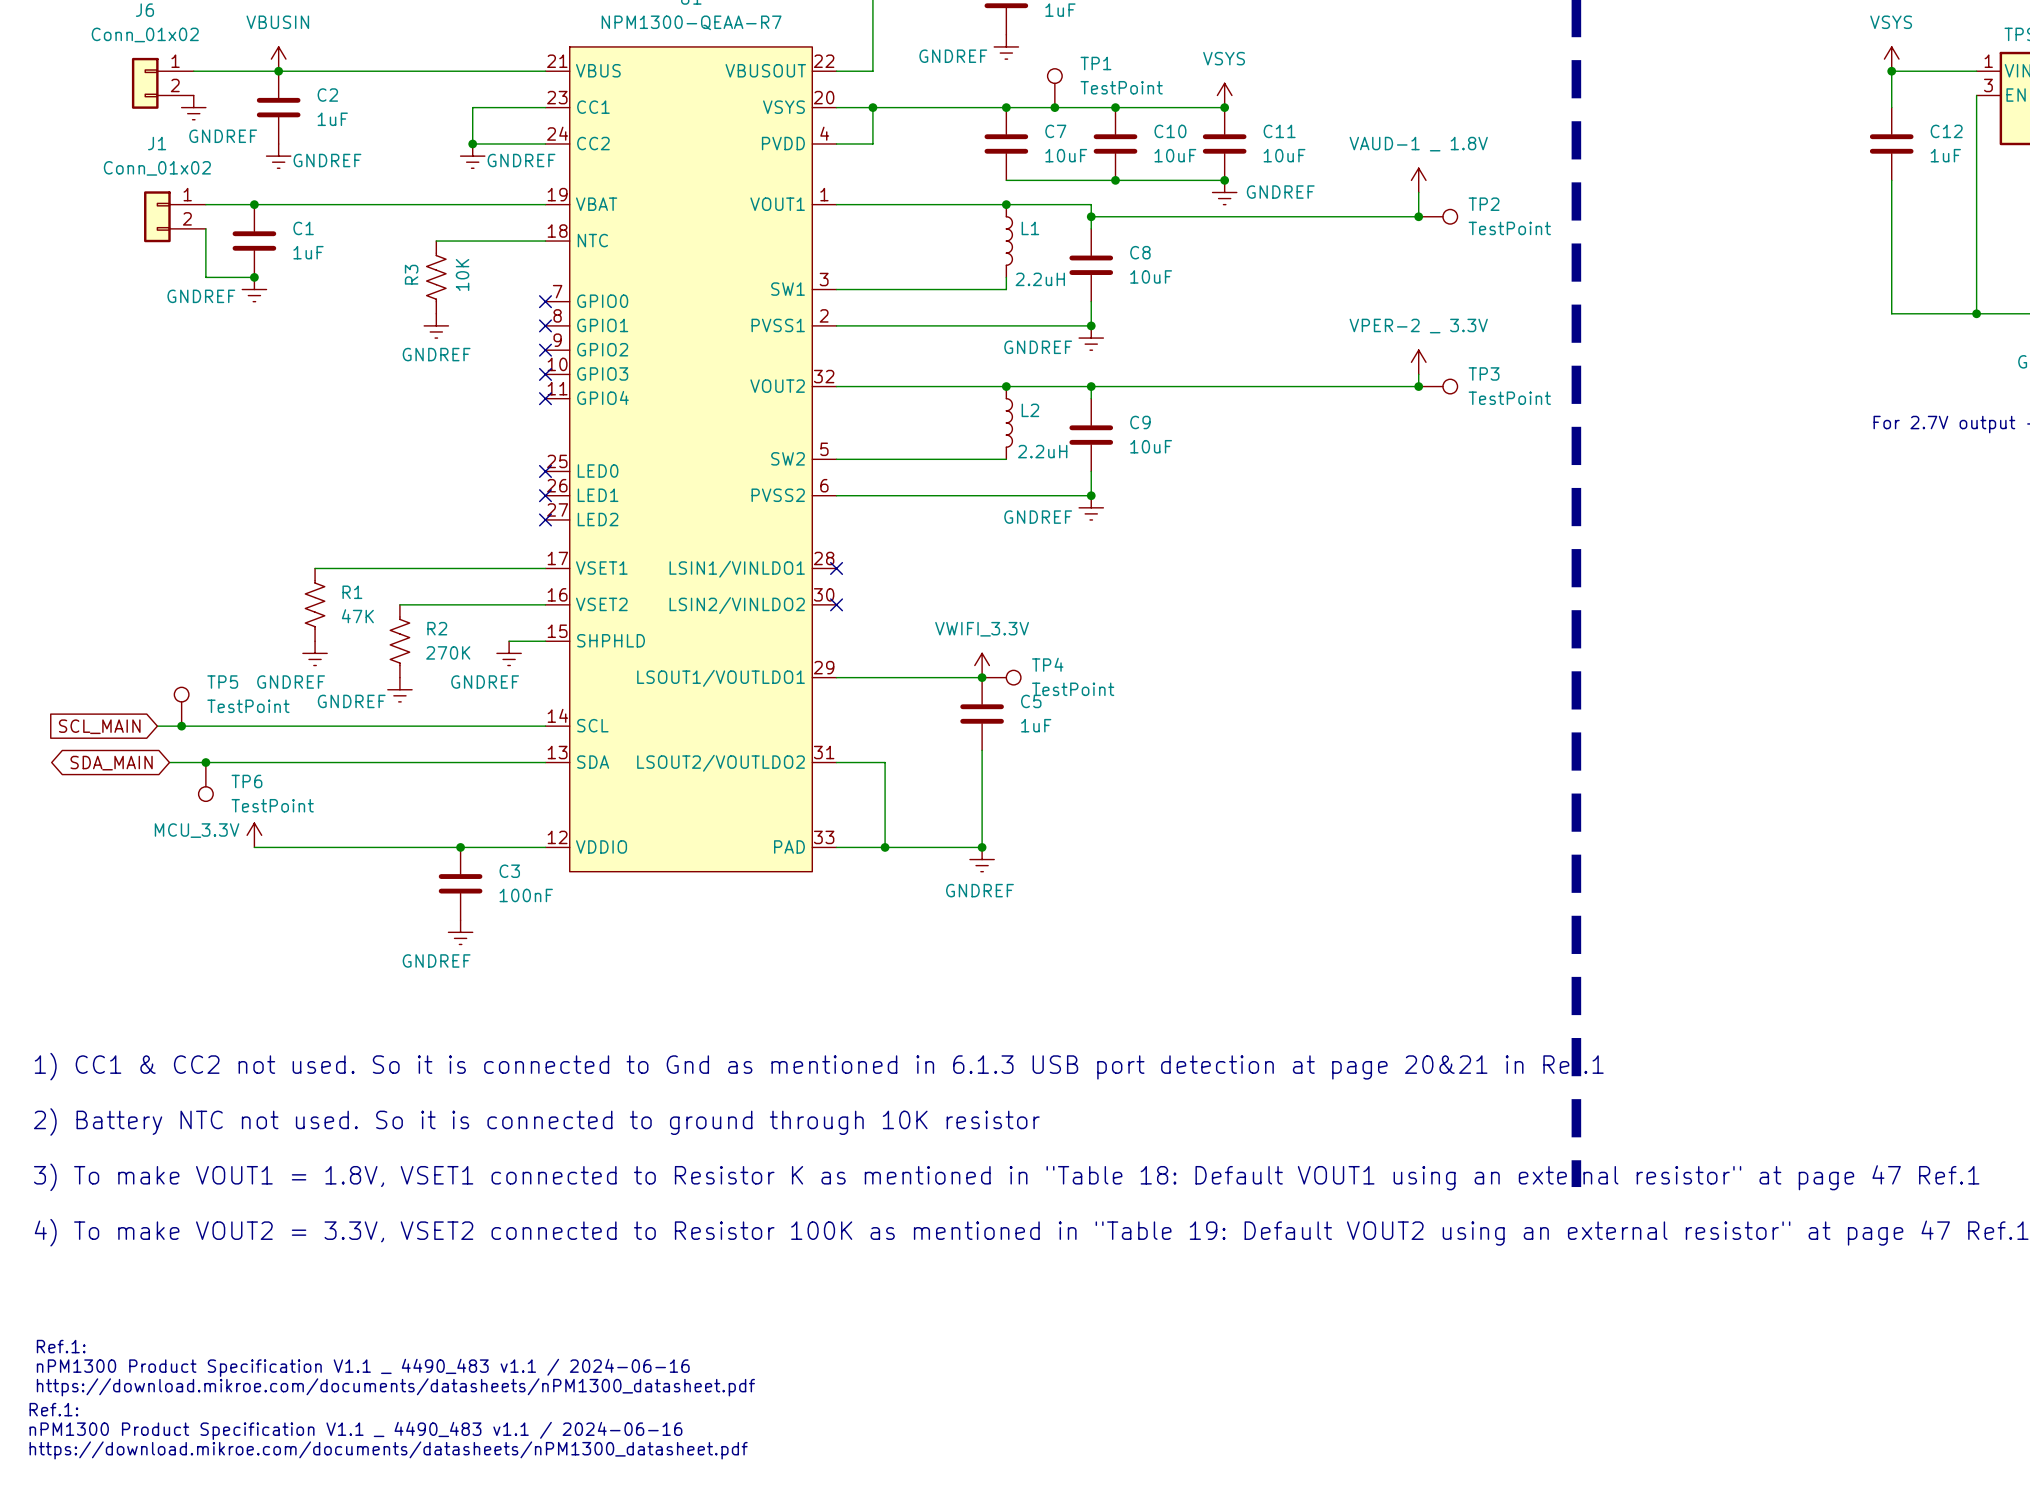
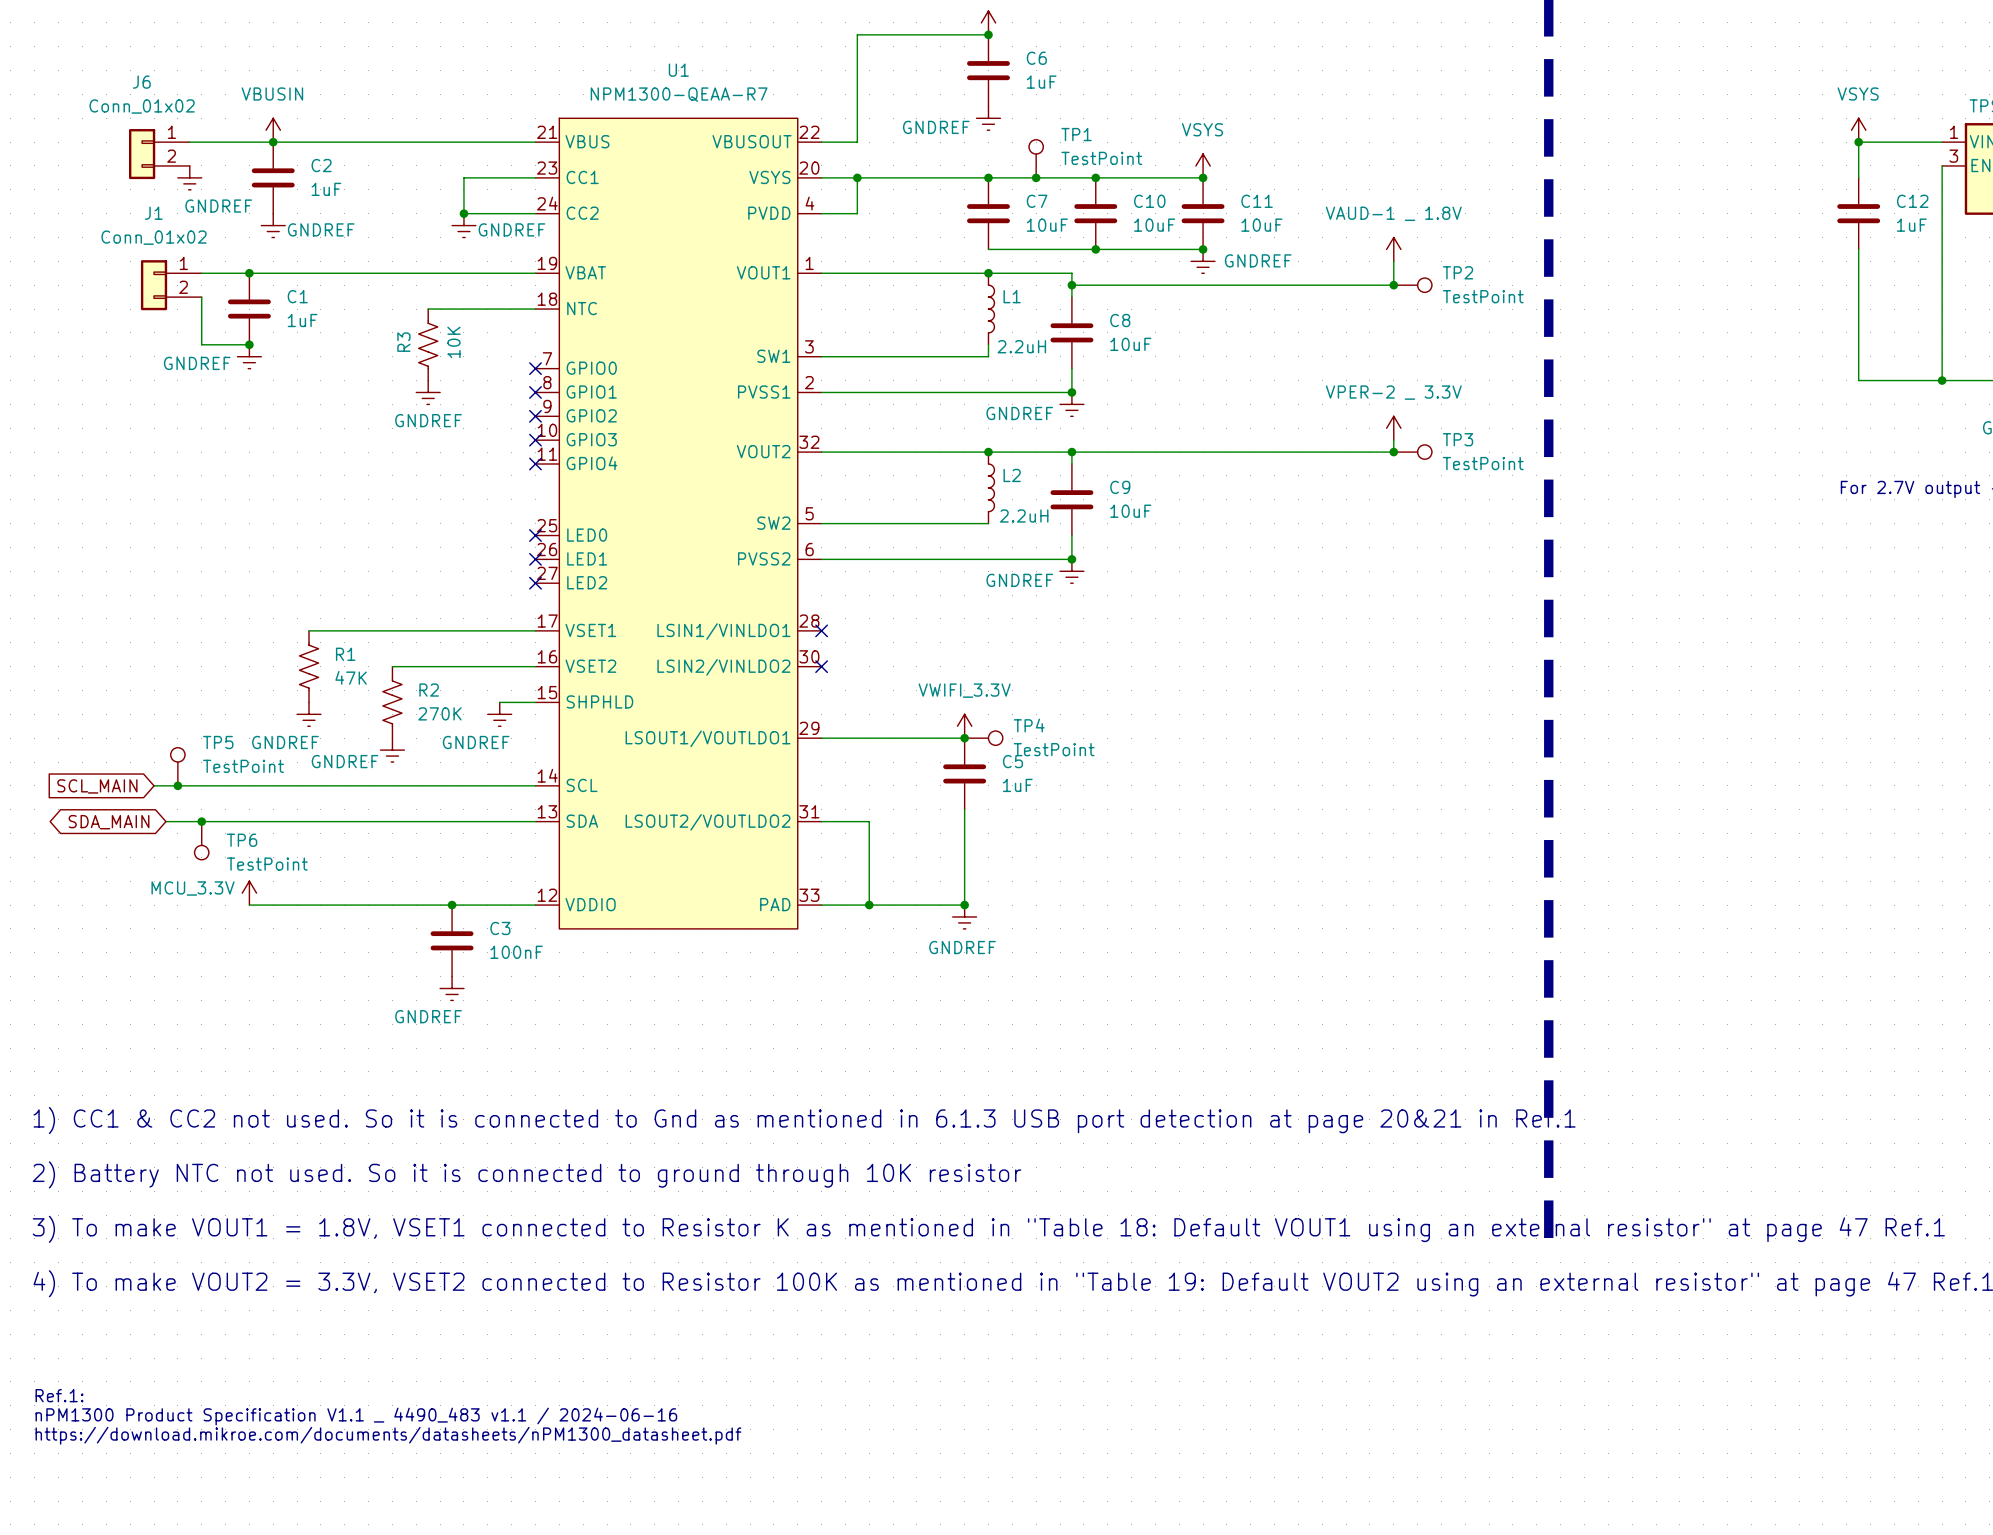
text: Ref.1: (53, 1409) -> none
text: nPM1300 Product Specification V1.1 _ 4490_483 v1.1 / 2024-06-16 (355, 1430) -> none
text: https://download.mikroe.com/documents/datasheets/nPM1300_datasheet.pdf (388, 1450) -> none

